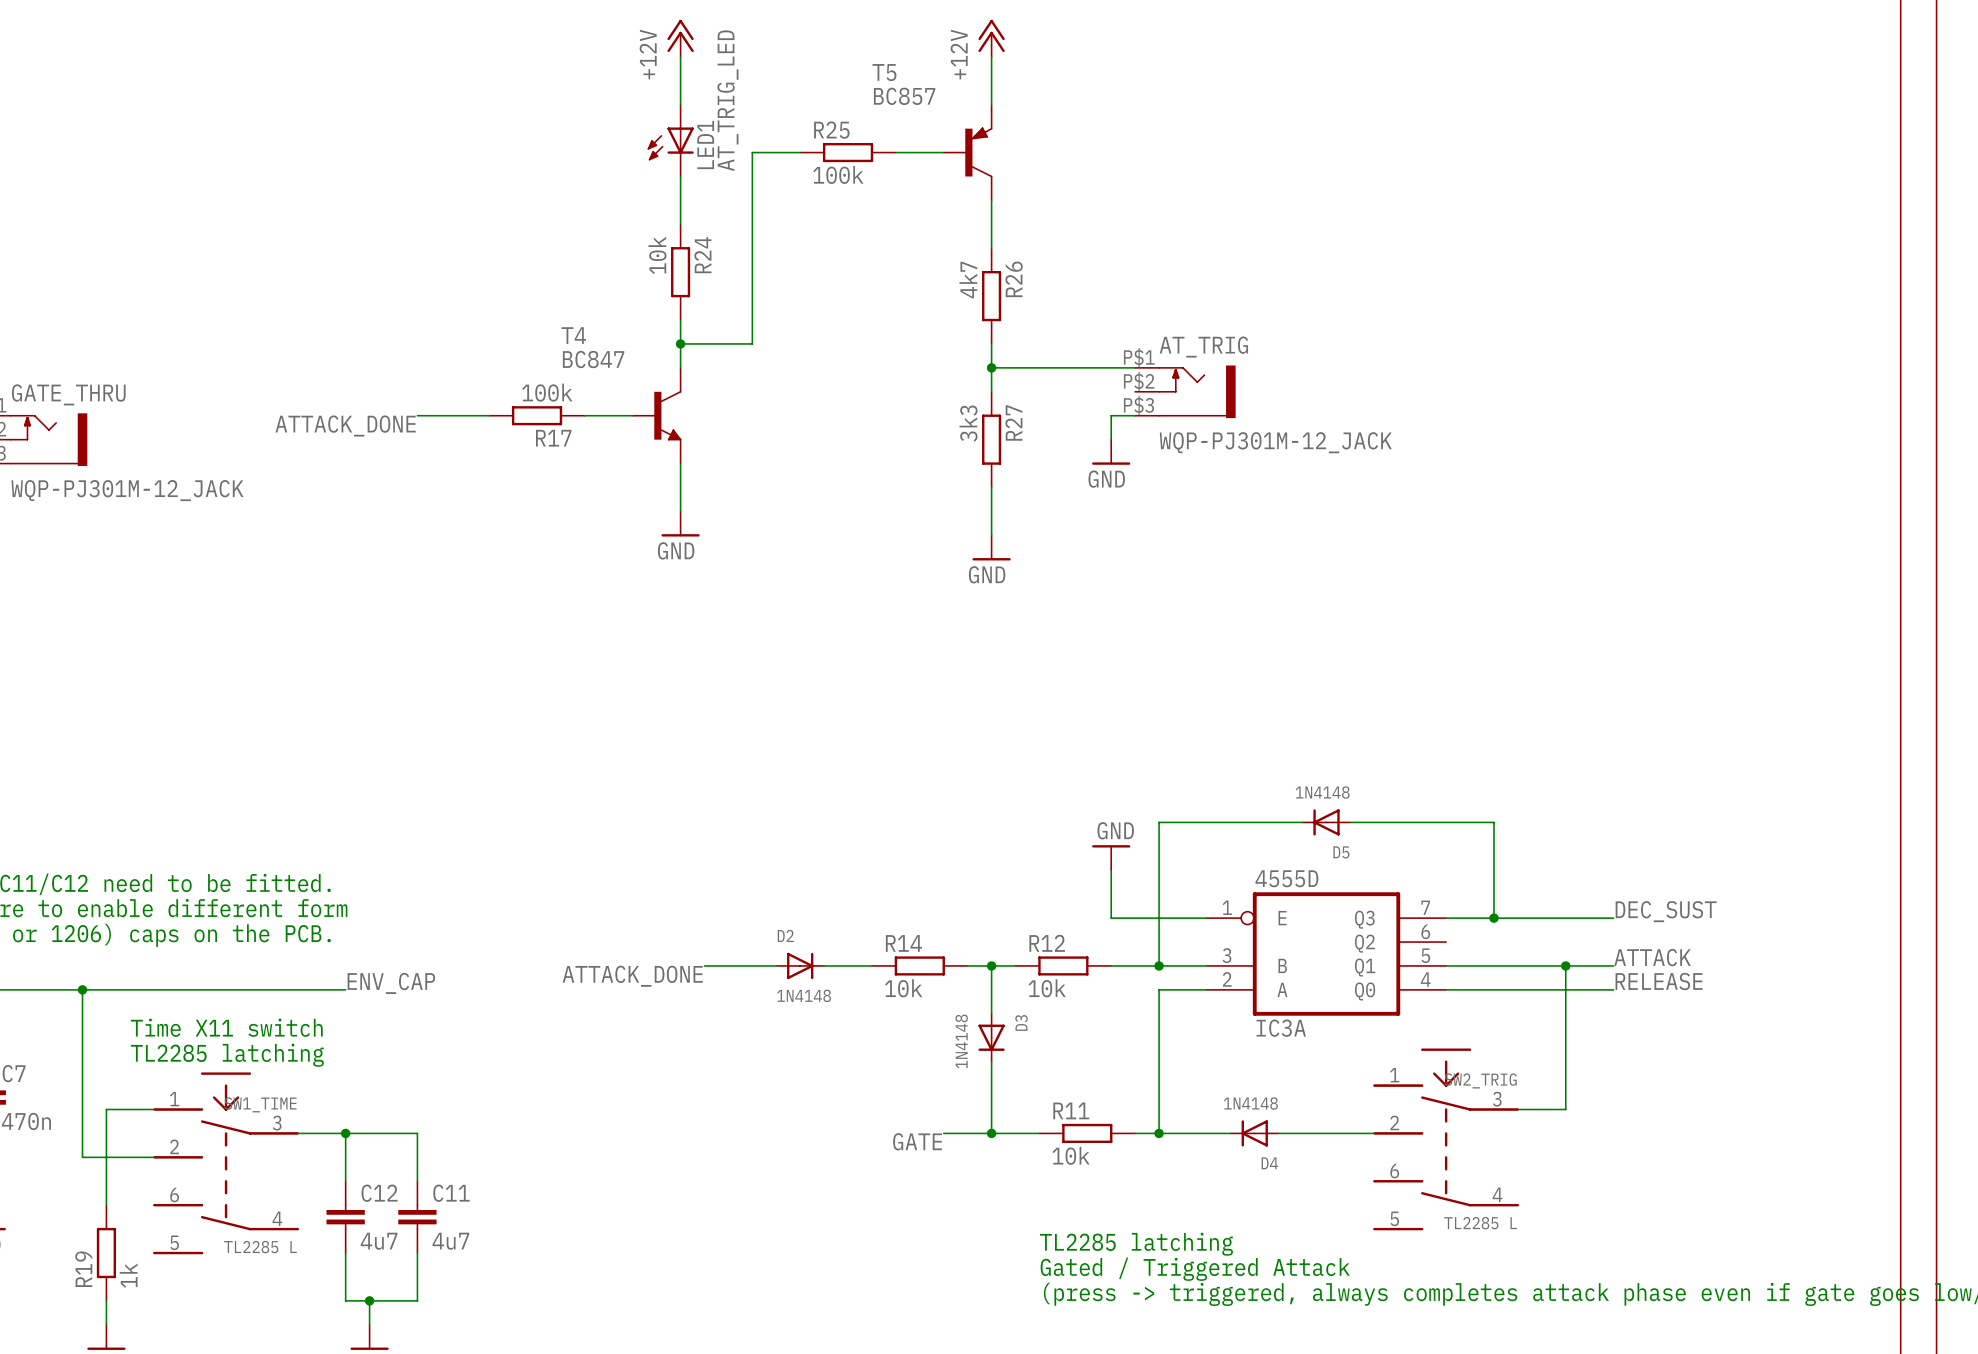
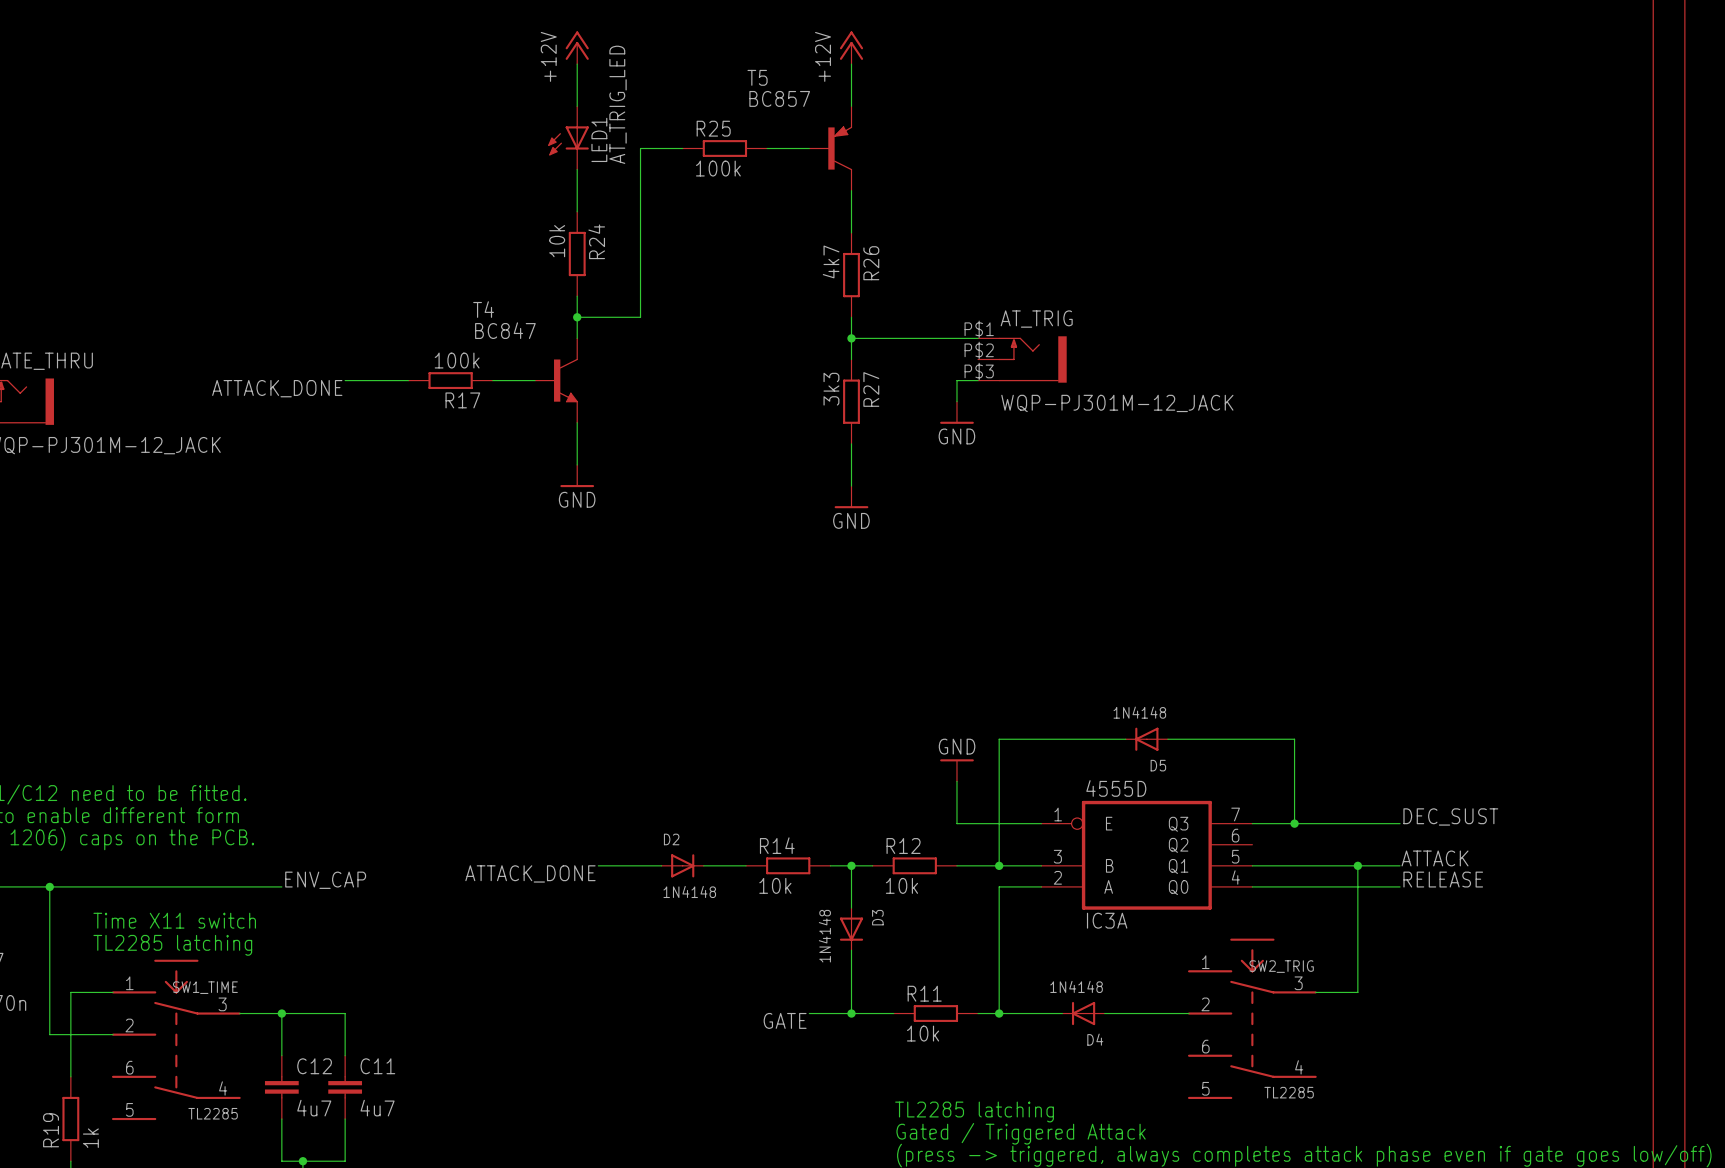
SW2_TRIG value: TL2285 L (1480, 1223) -> TL2285 (1289, 1092)
SW1_TIME value: TL2285 L (260, 1247) -> TL2285 (213, 1113)

